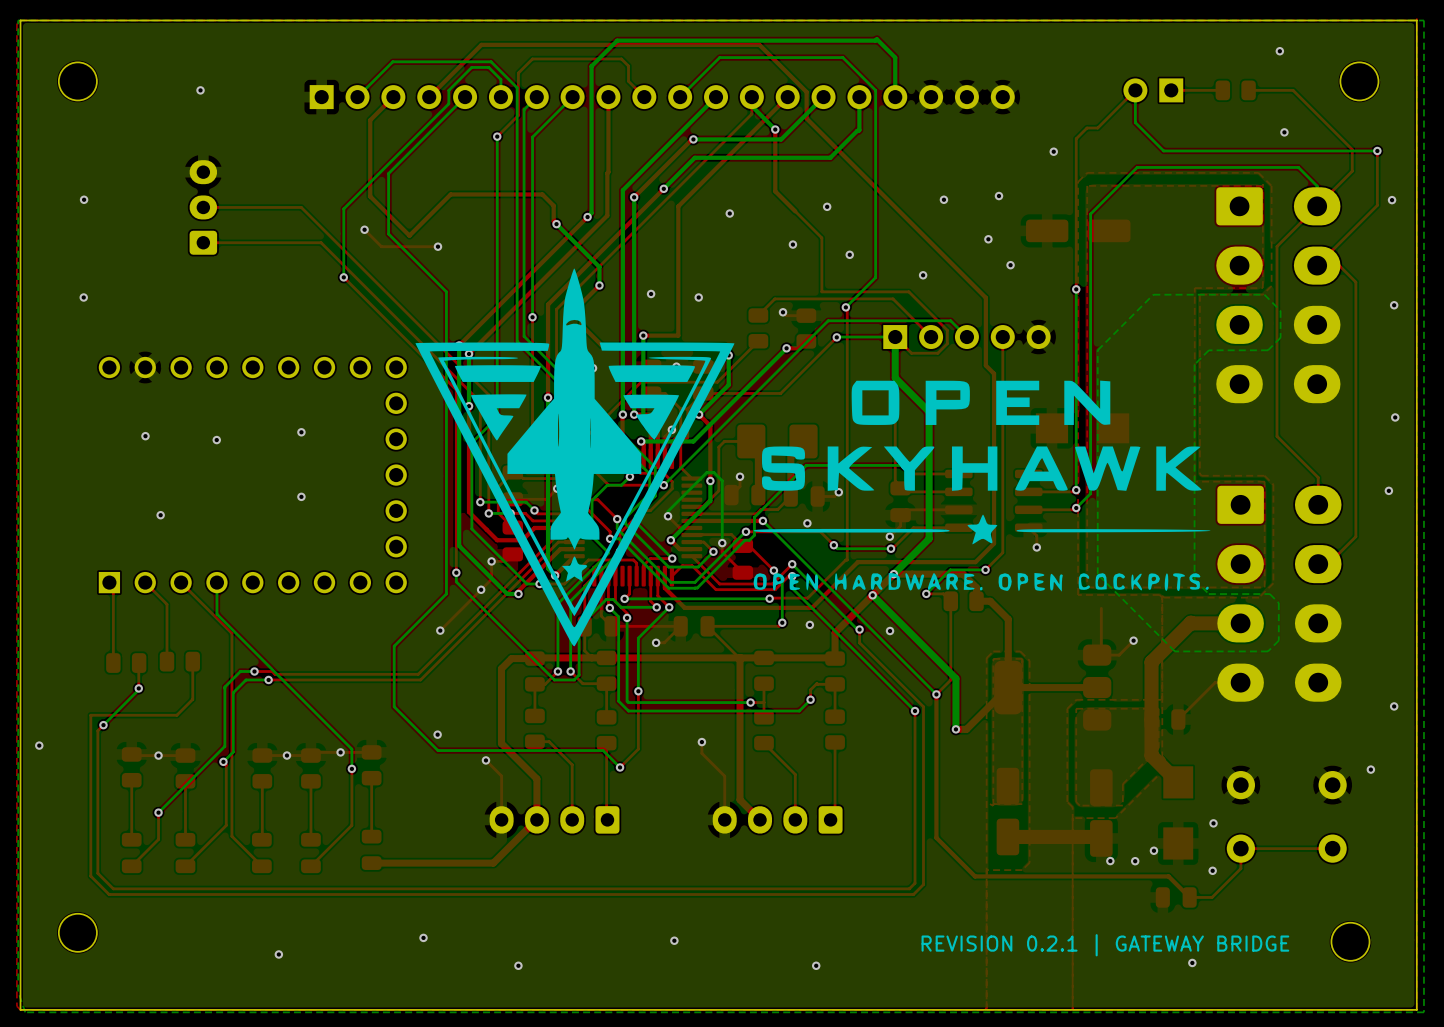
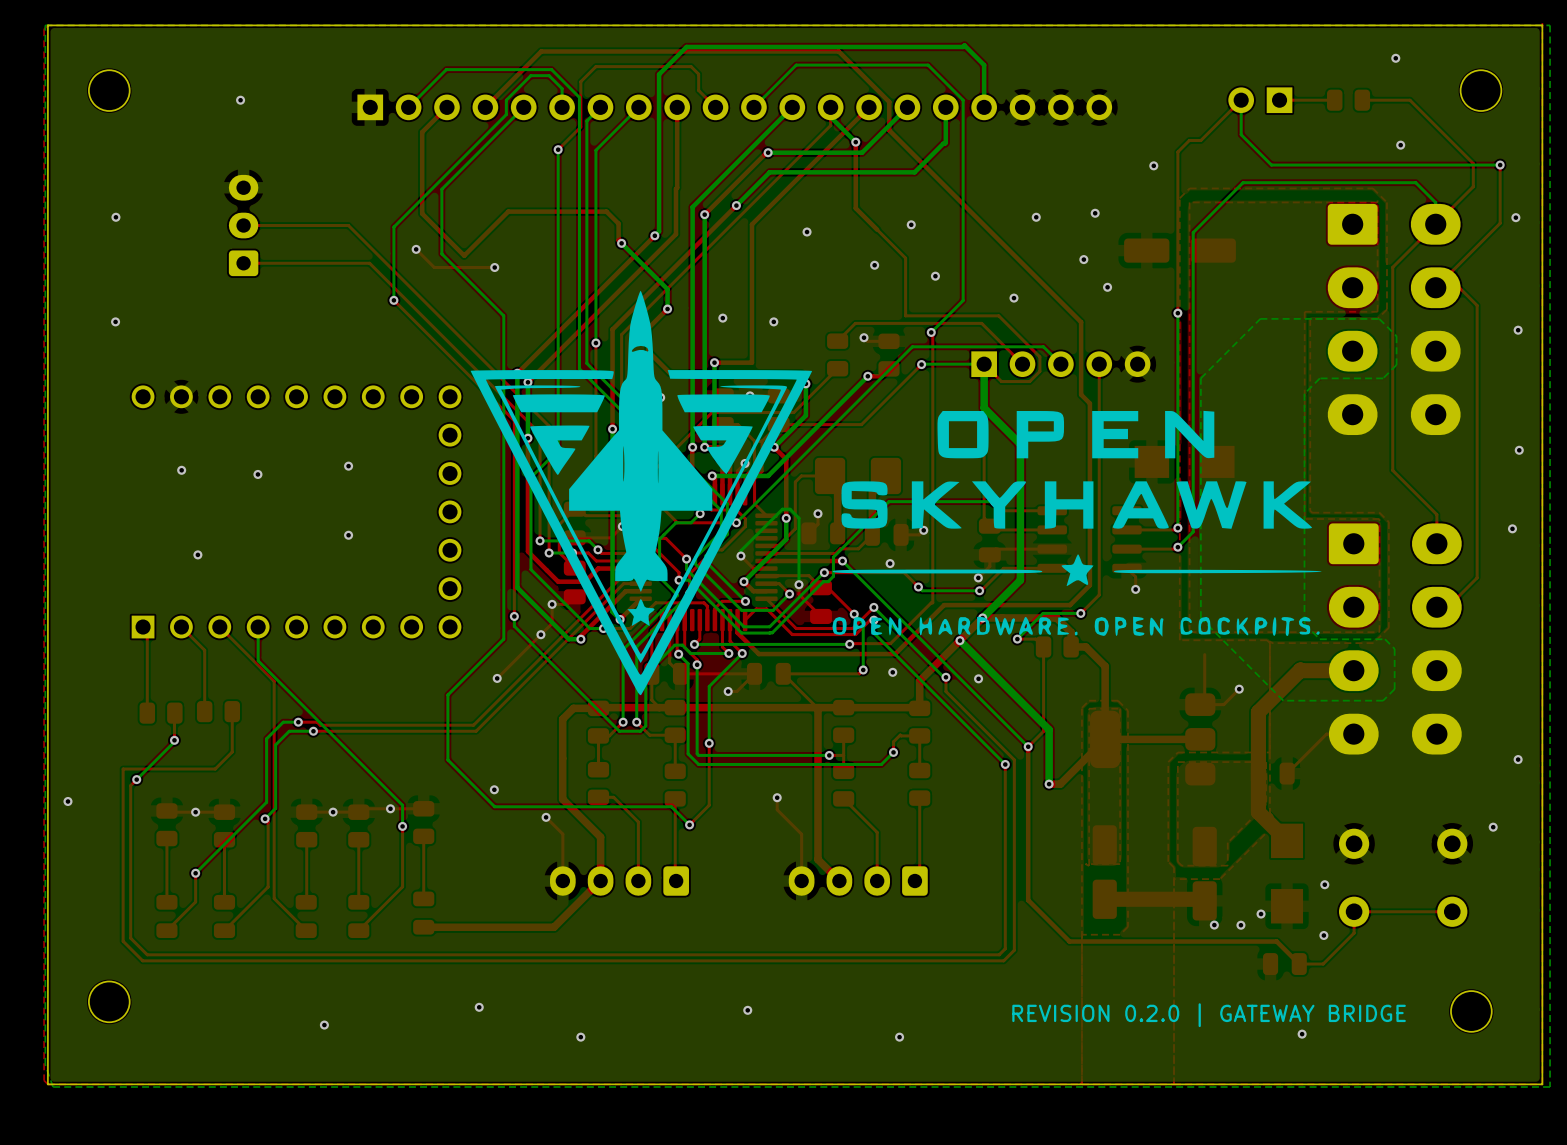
text: REVISION 0.2.1 | GATEWAY BRIDGE (1105, 945) -> REVISION 0.2.0 | GATEWAY BRIDGE (1209, 1015)

